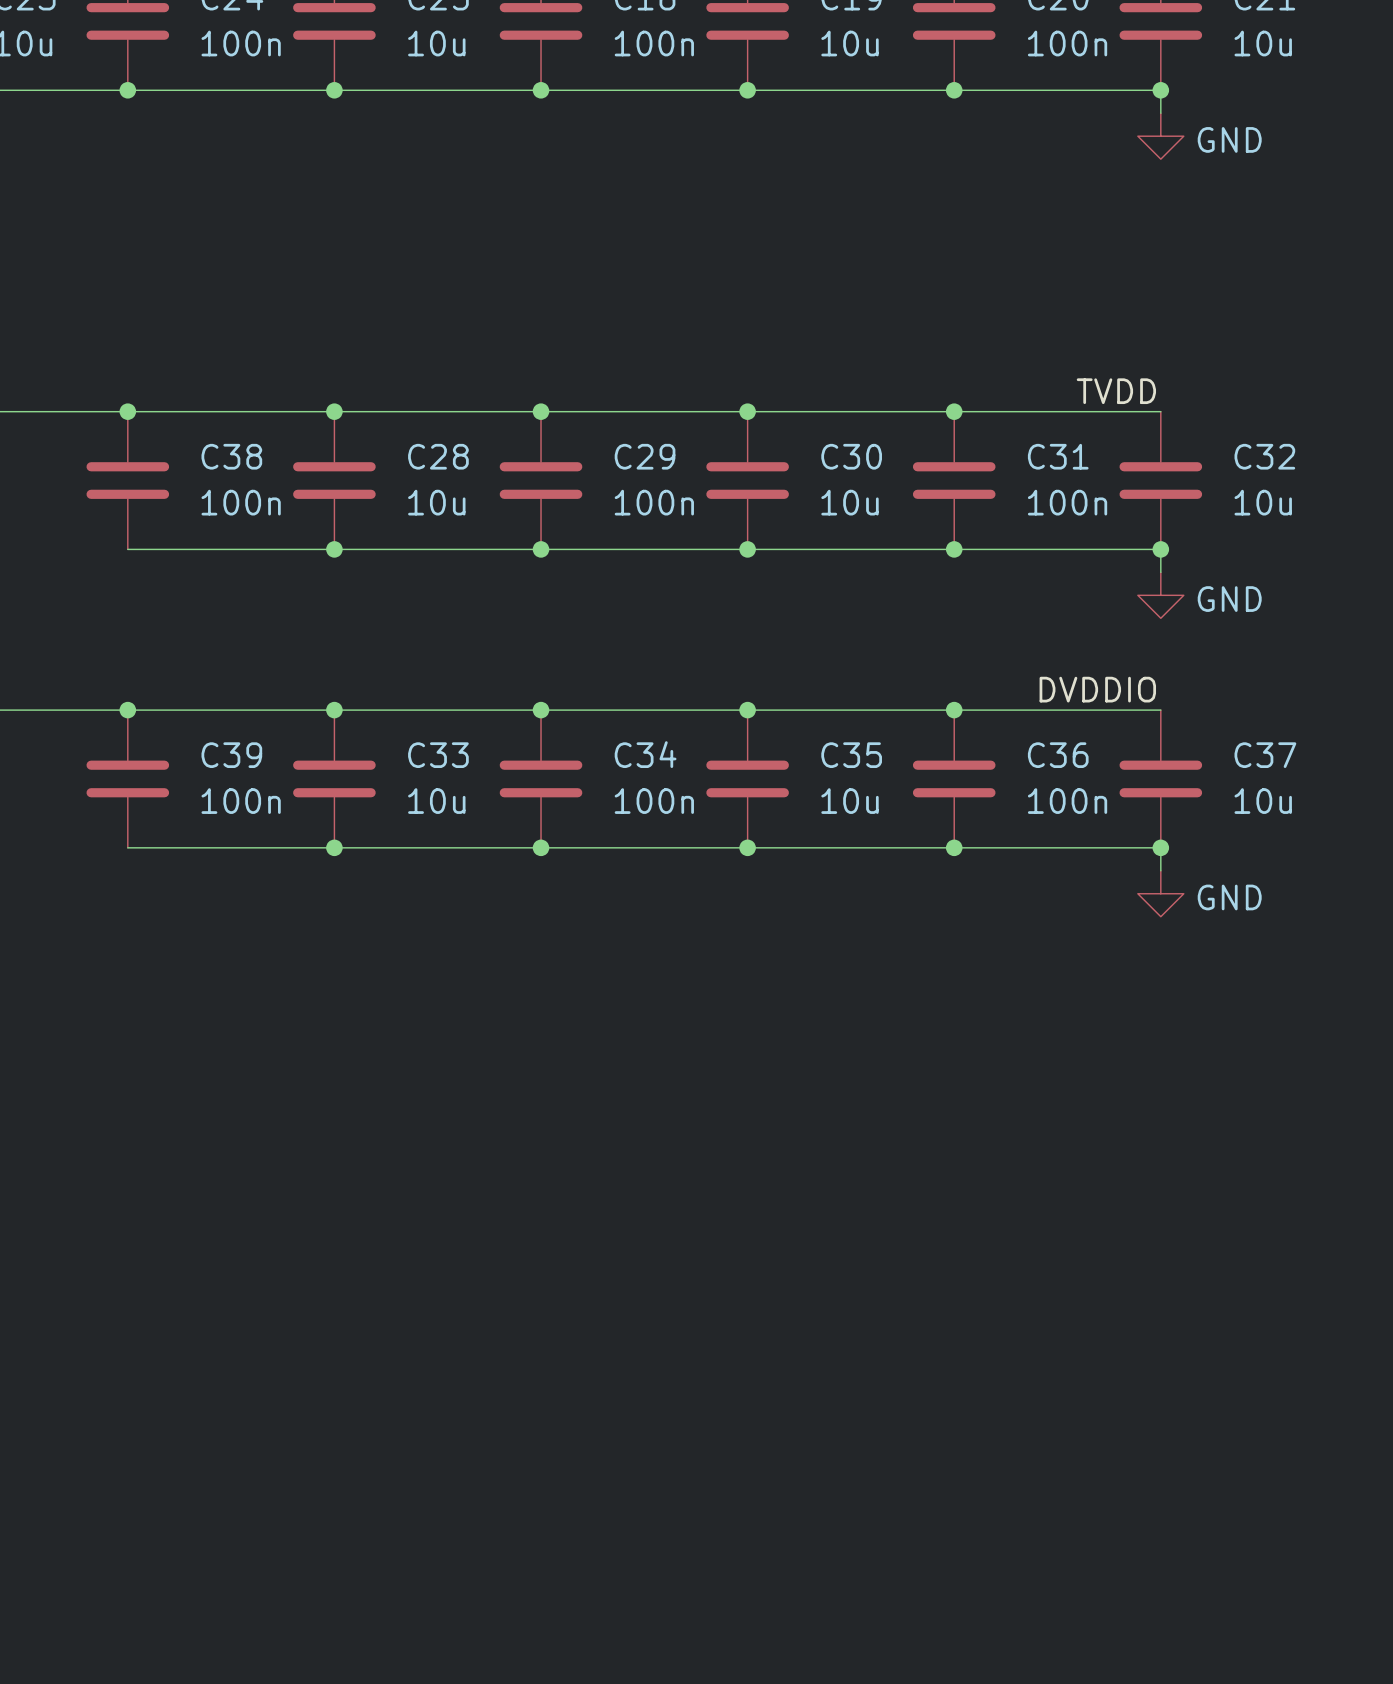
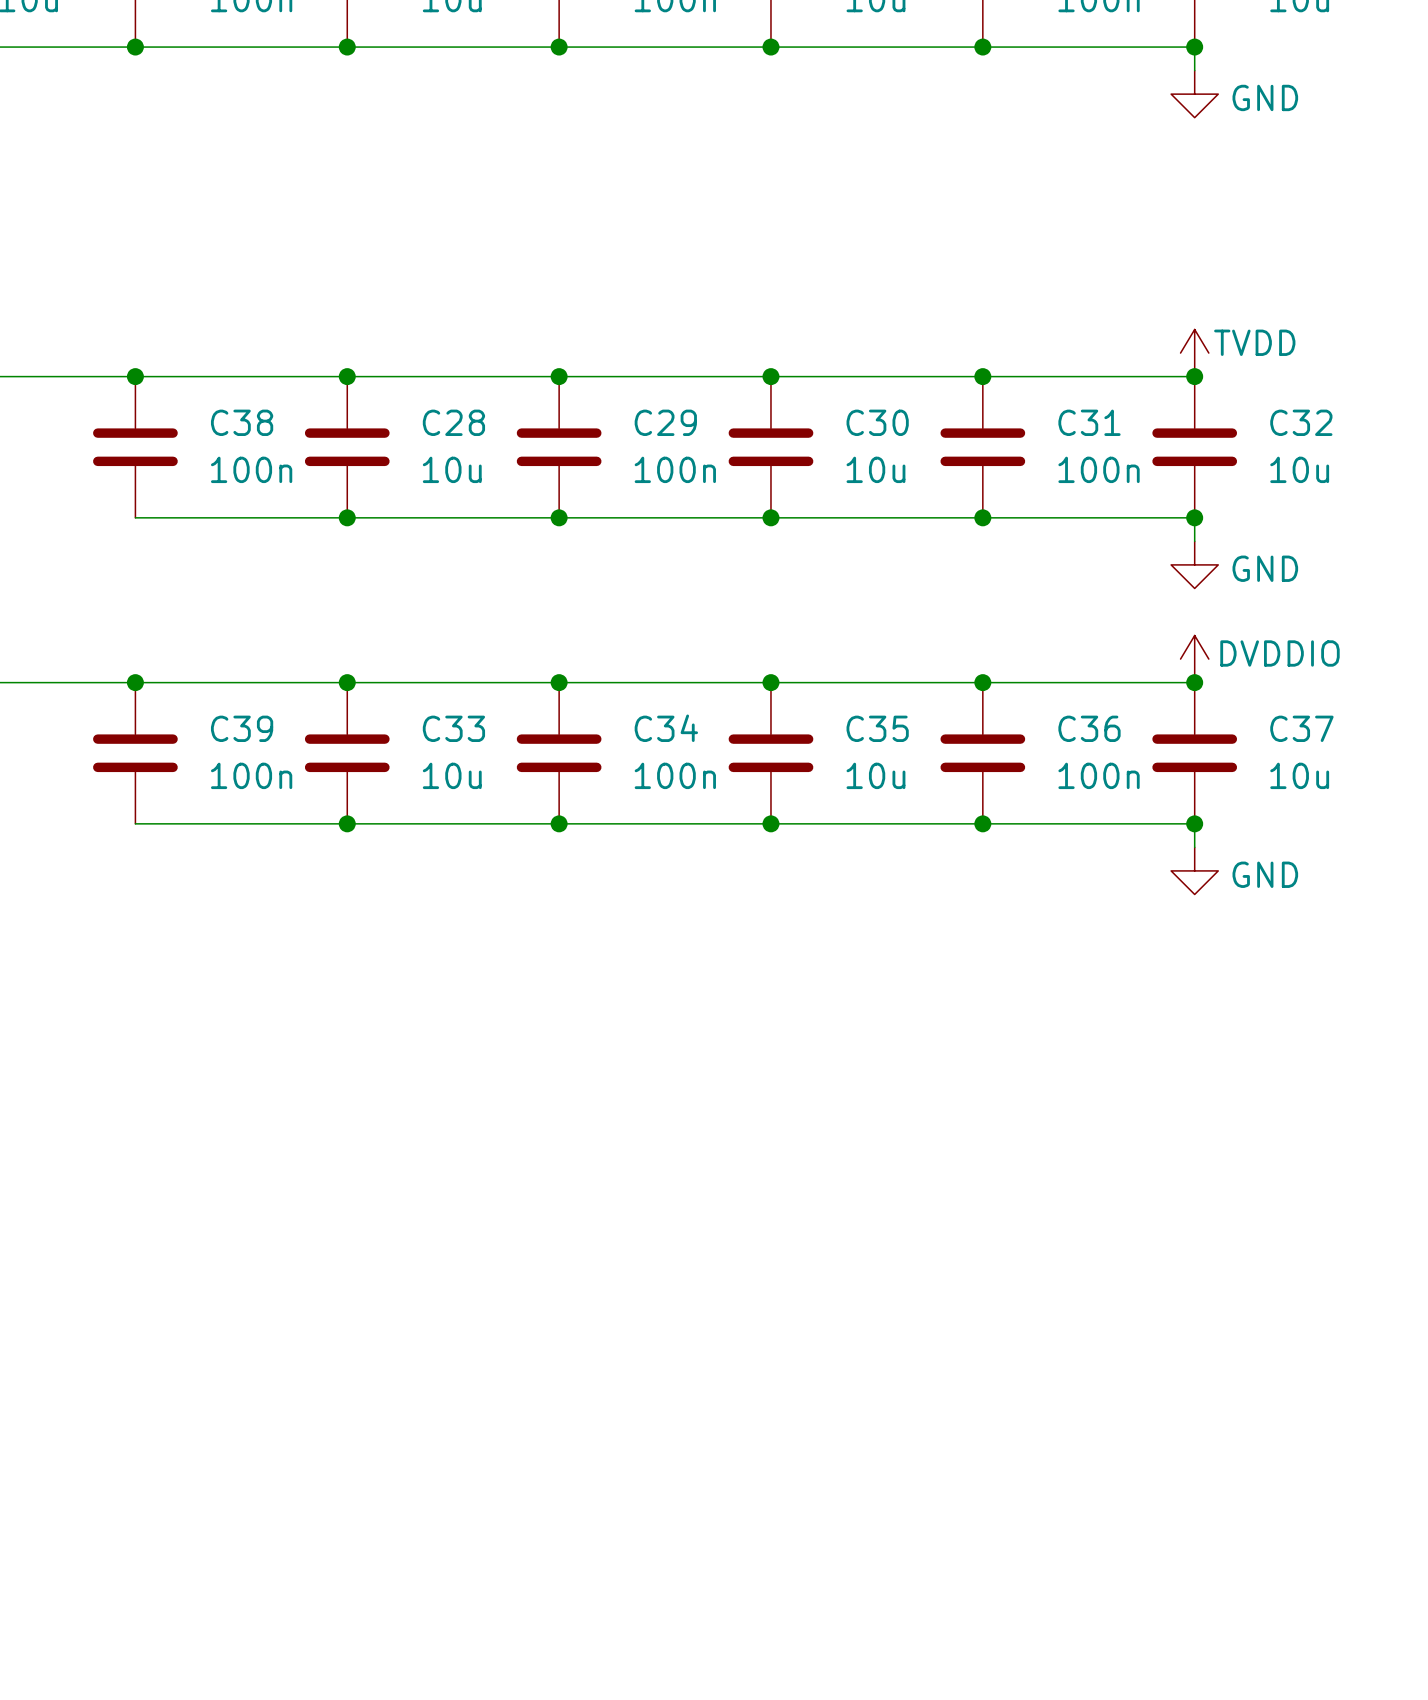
power symbol: none -> TVDD (1194, 353)
label: TVDD (1116, 391) -> none
junction: none -> (1194, 376)
power symbol: none -> DVDDIO (1194, 659)
label: DVDDIO (1097, 689) -> none
junction: none -> (1194, 682)

